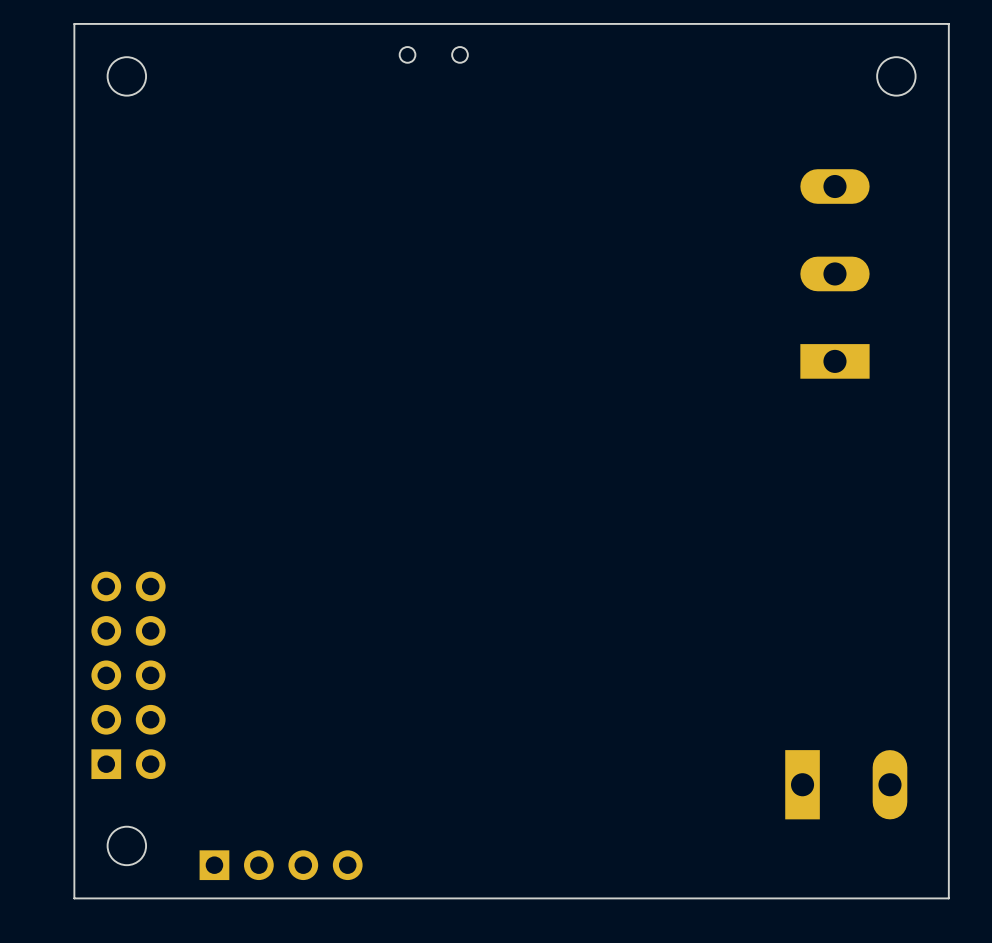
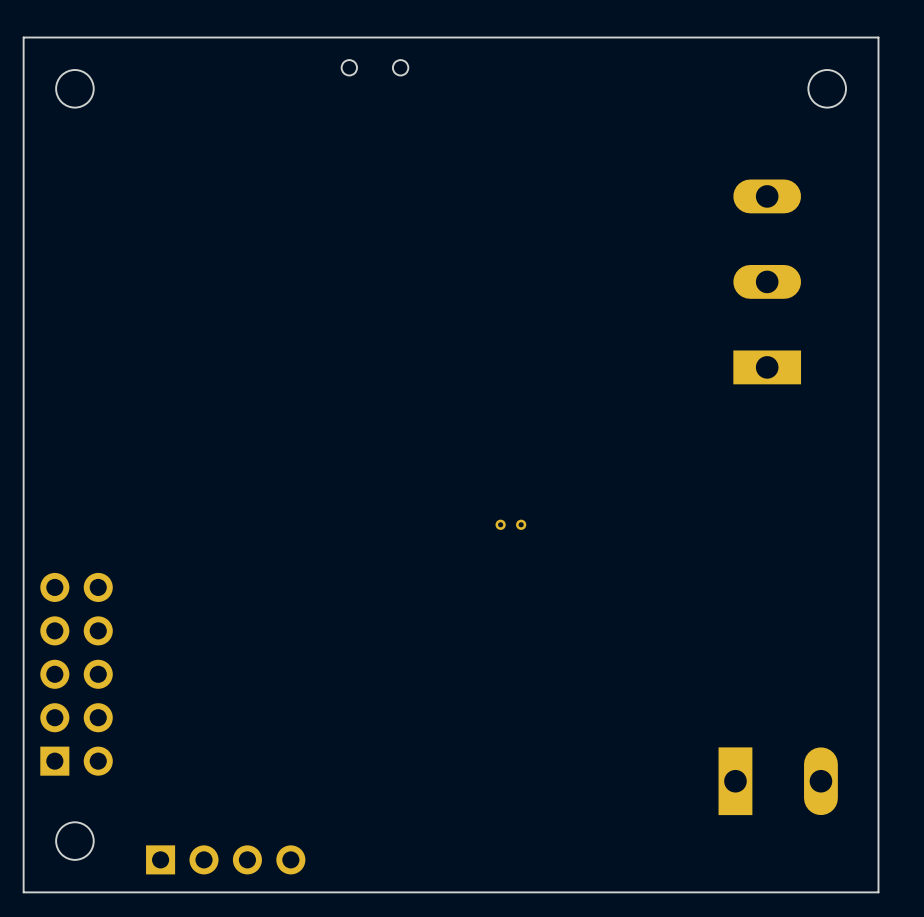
part: none -> (510, 524)

